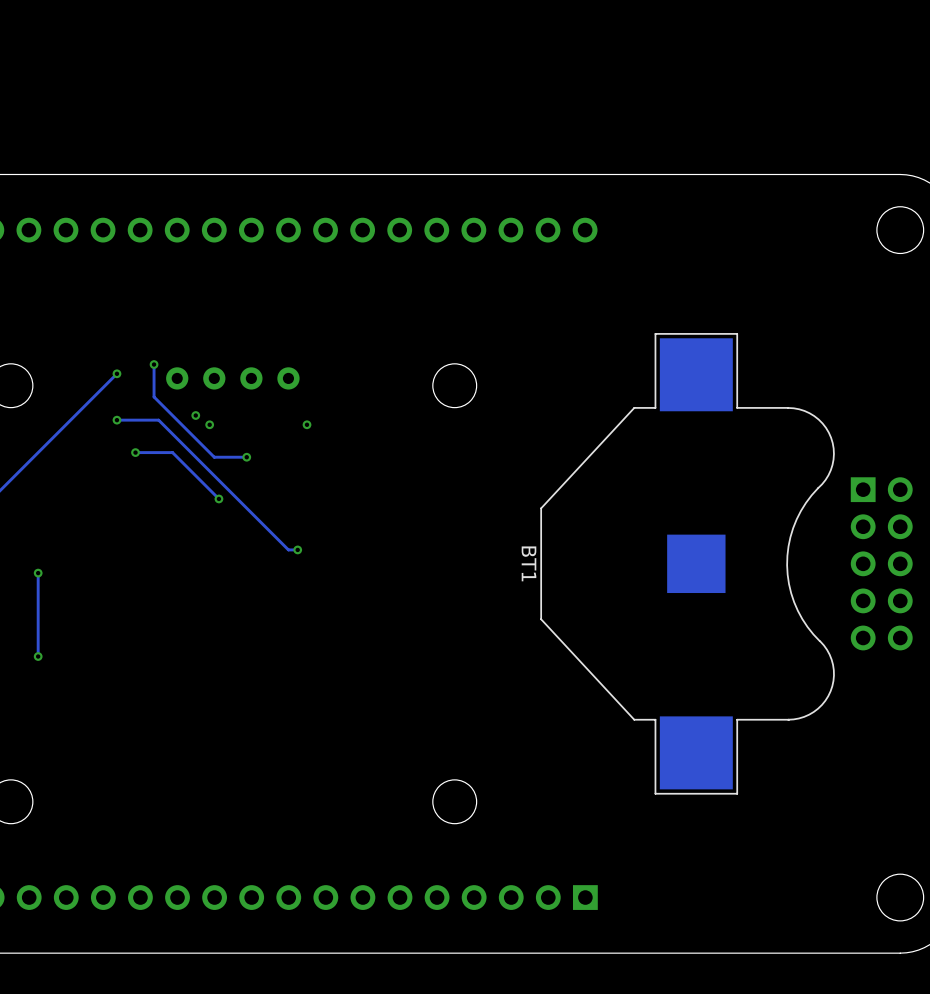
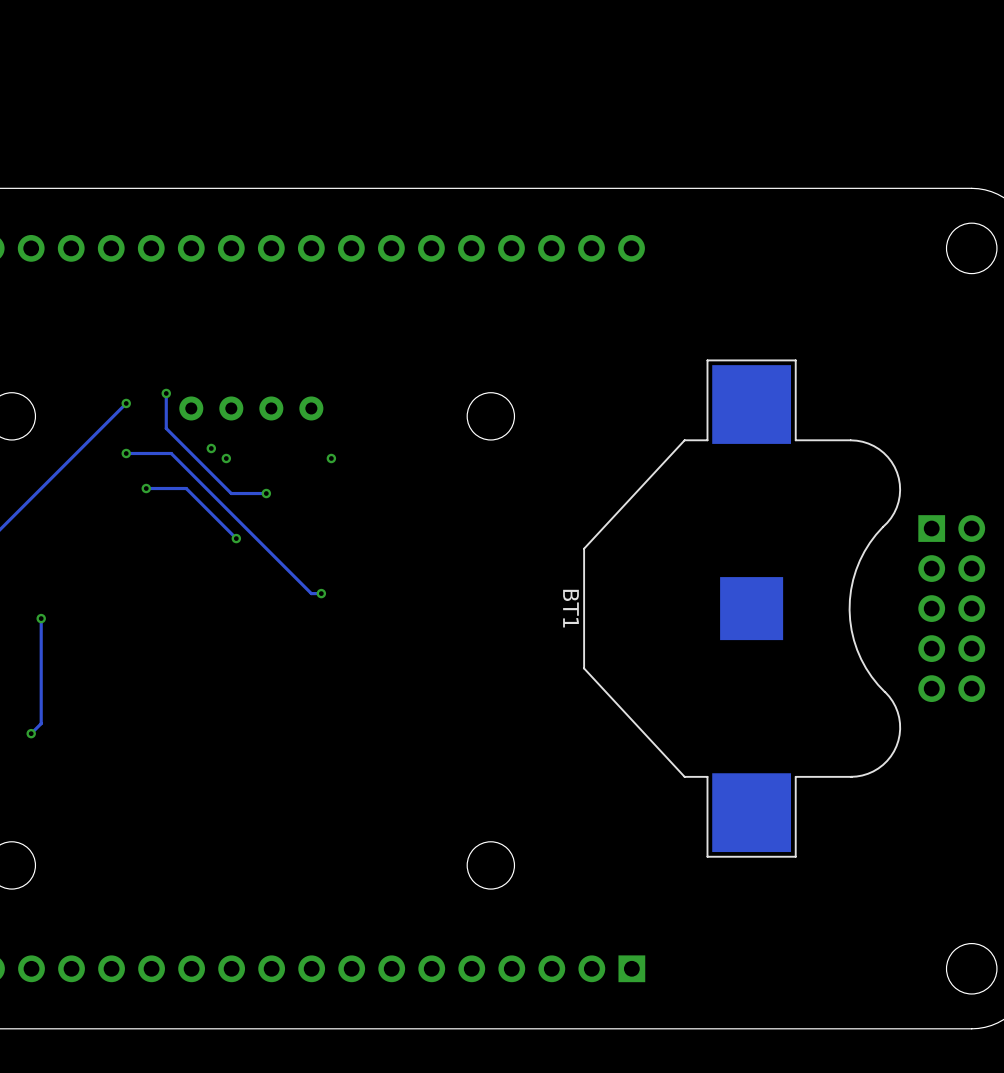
track: none -> (41, 708) (41, 723) (31, 733)
via: (38, 656) -> none
via: none -> (31, 733)

